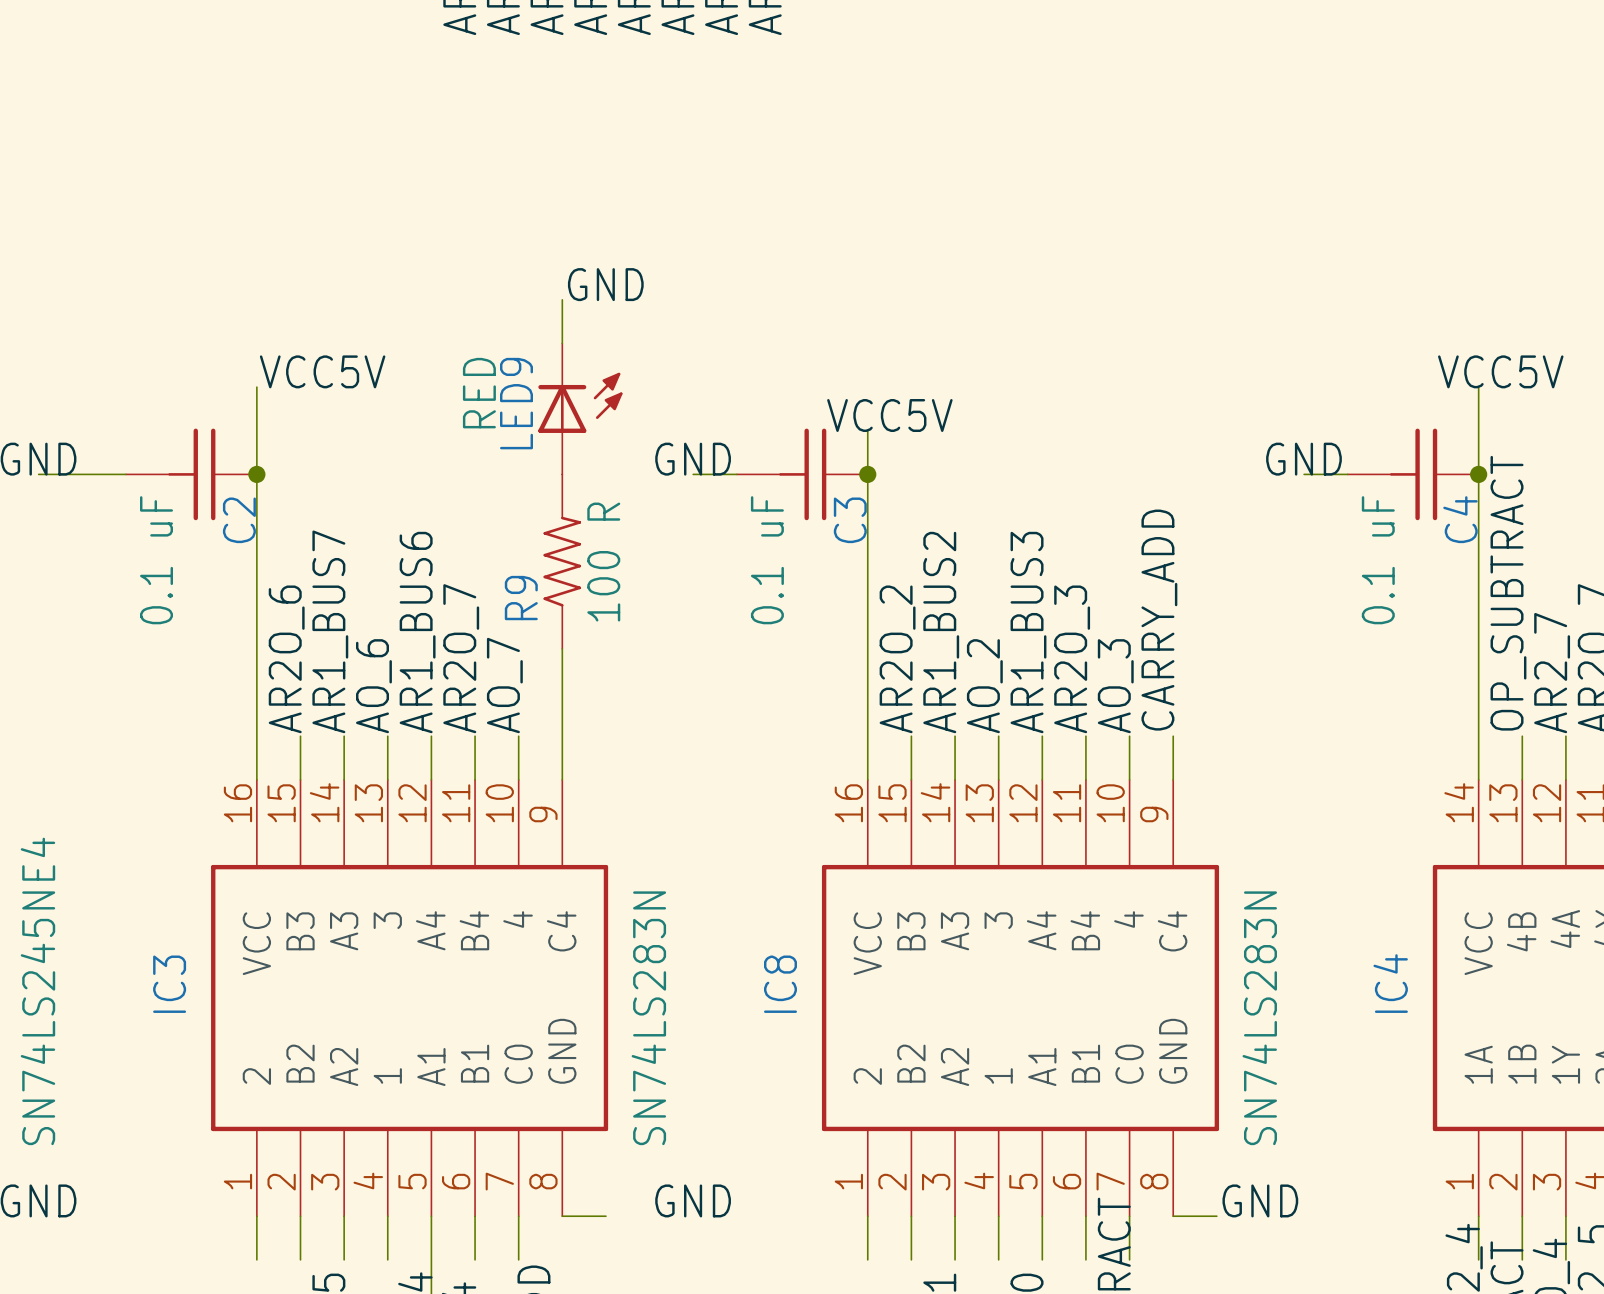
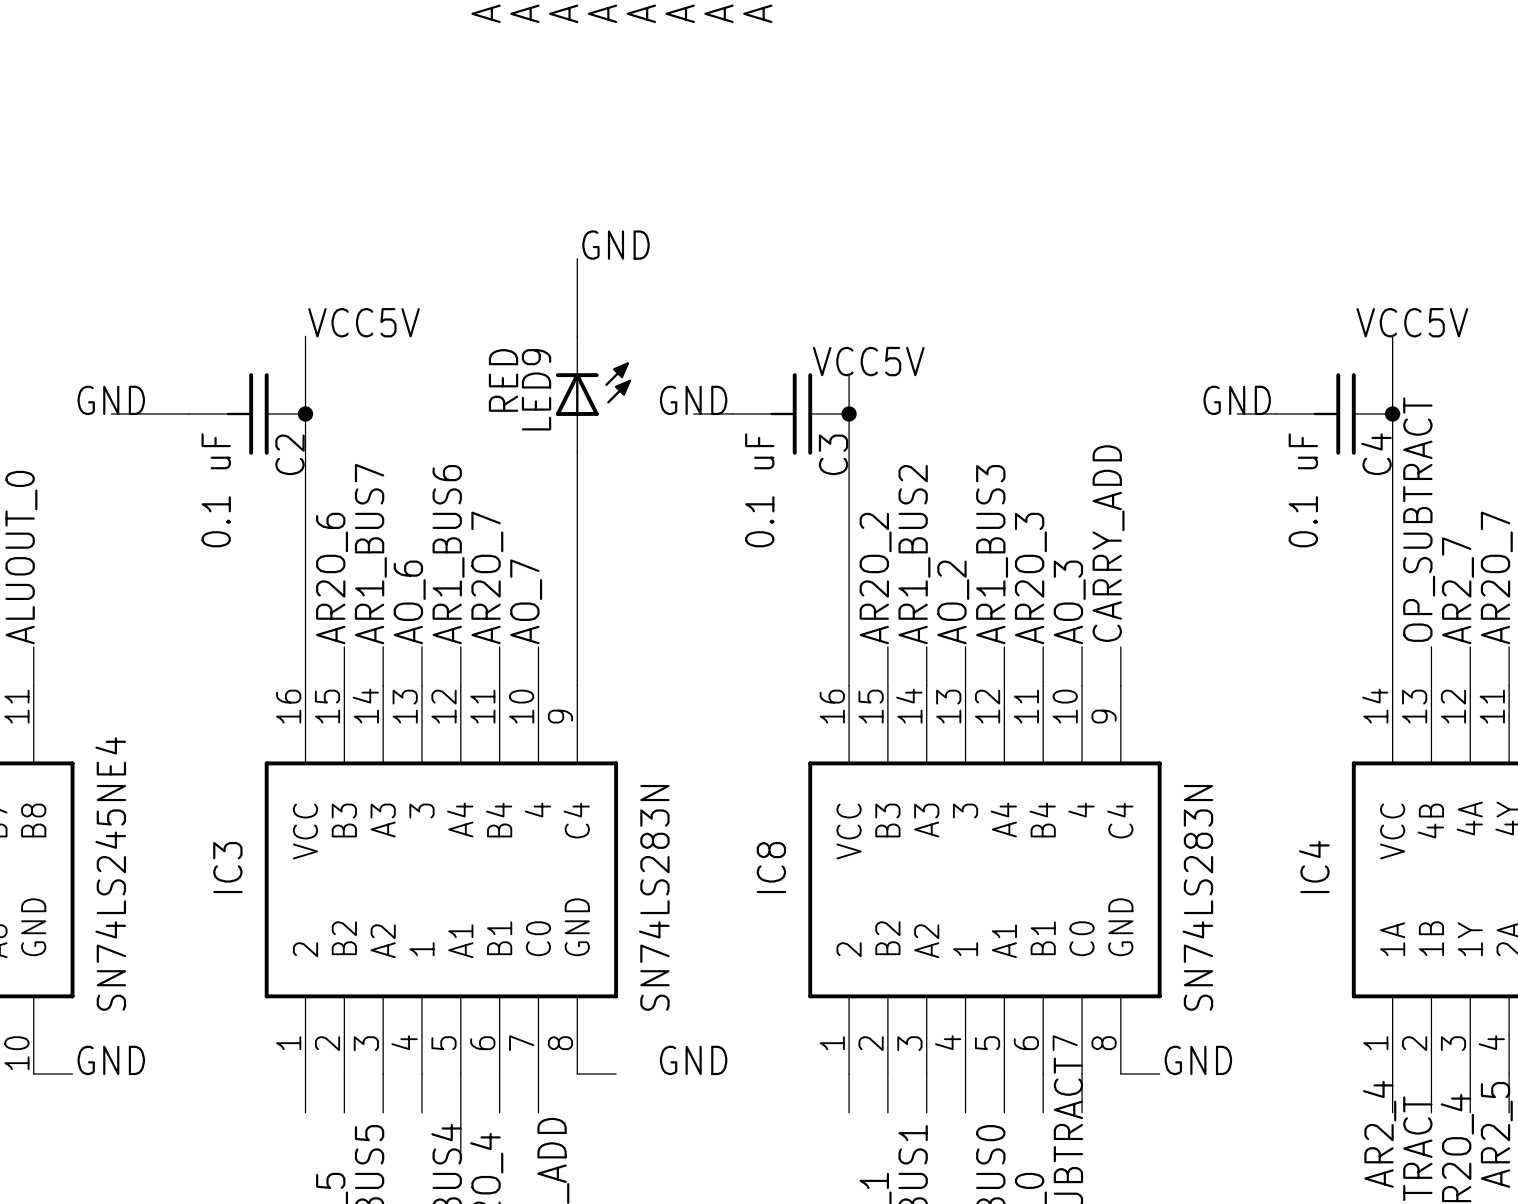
LED9 position: (580, 408) -> (593, 394)
wire: none -> (577, 452) (577, 569)
R9: 100 R (562, 561) -> none

